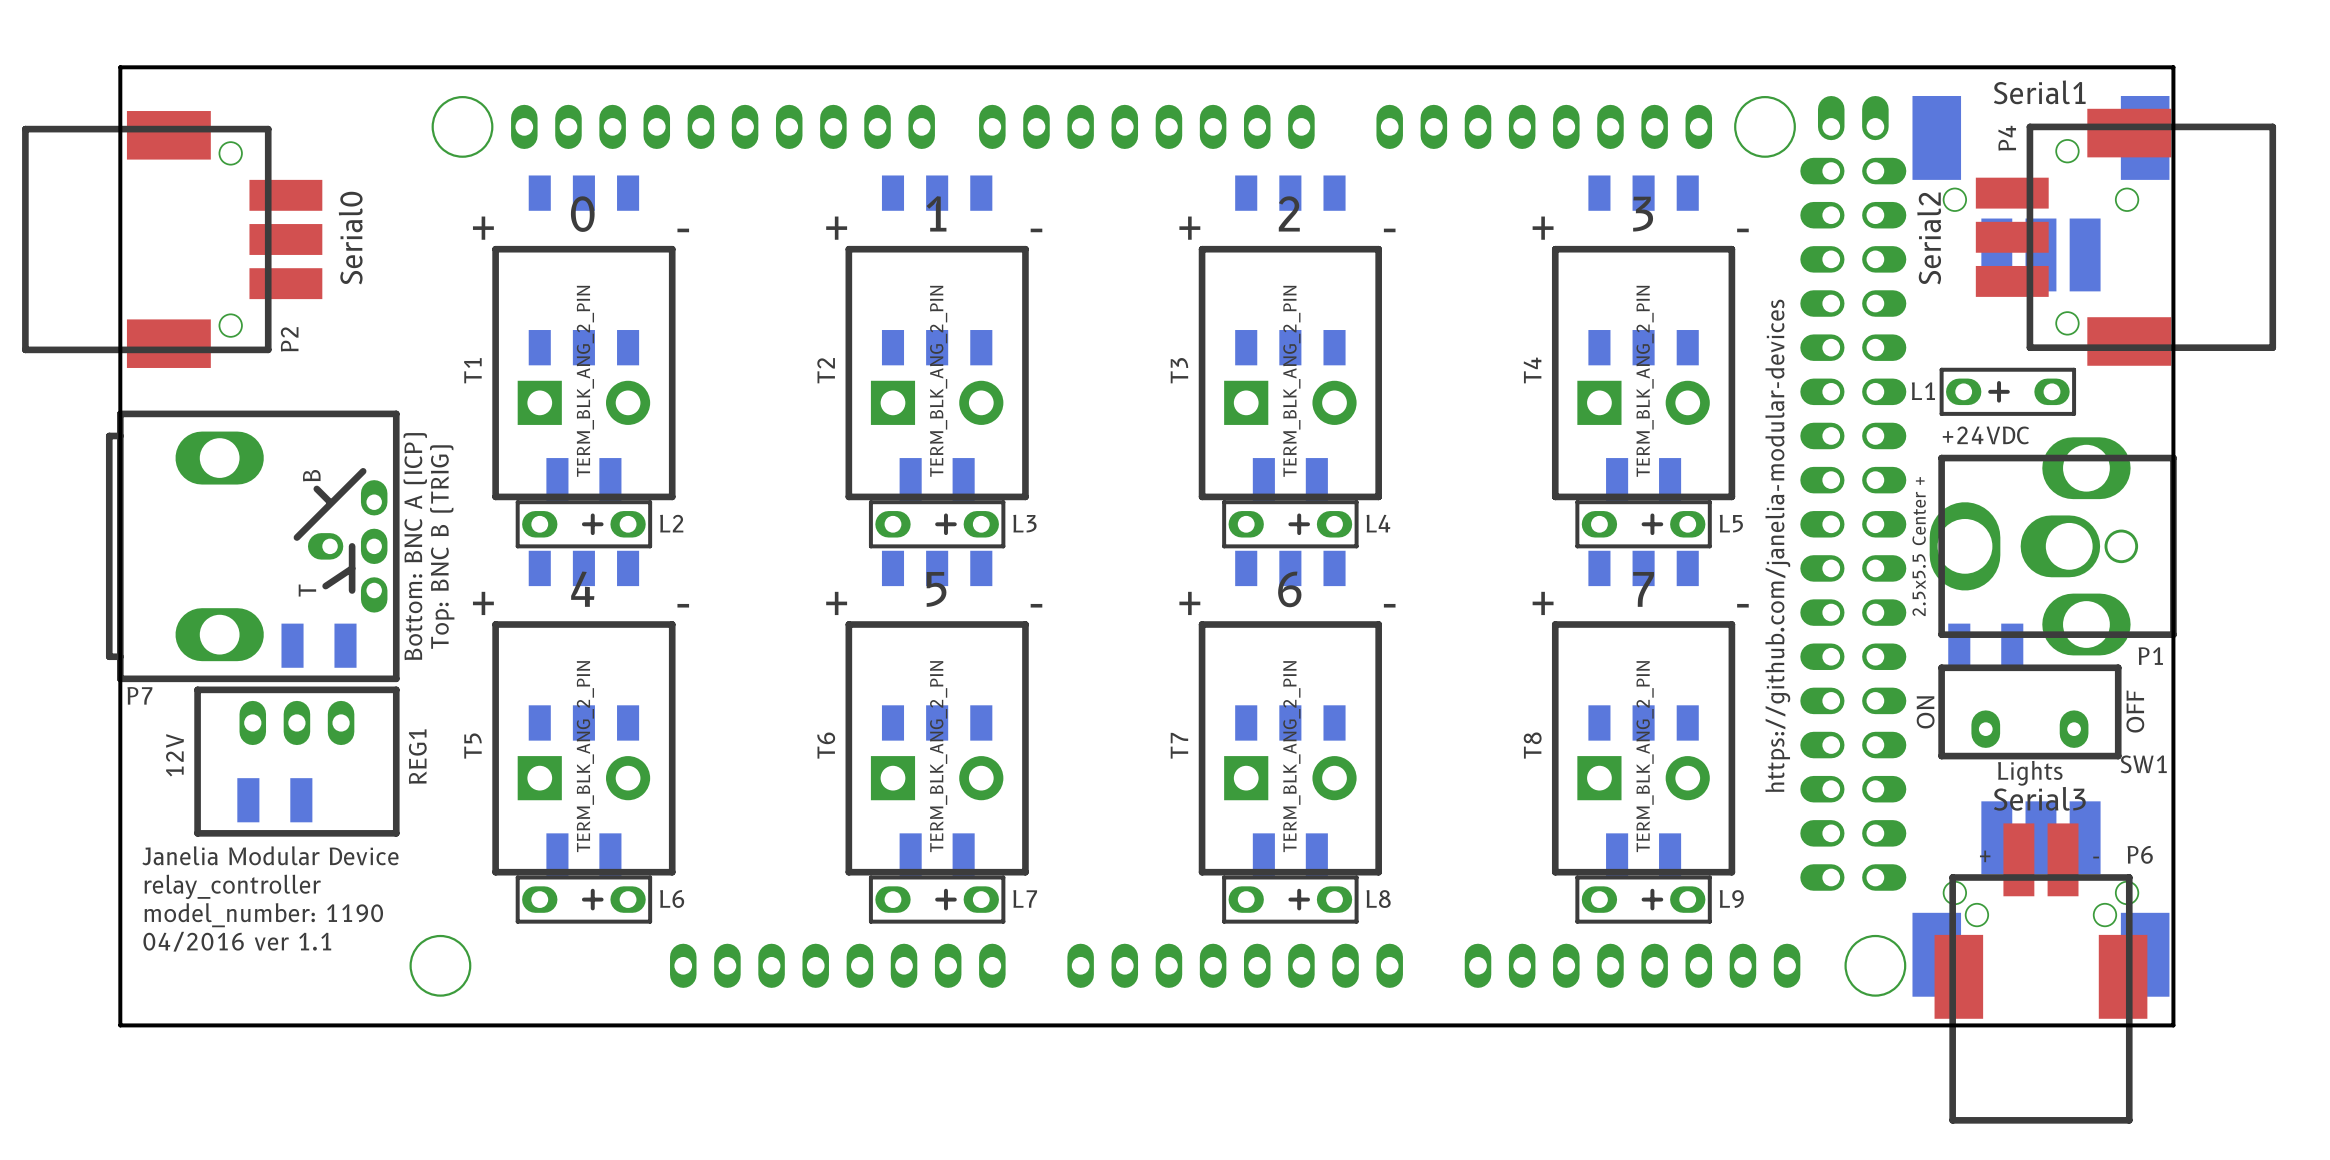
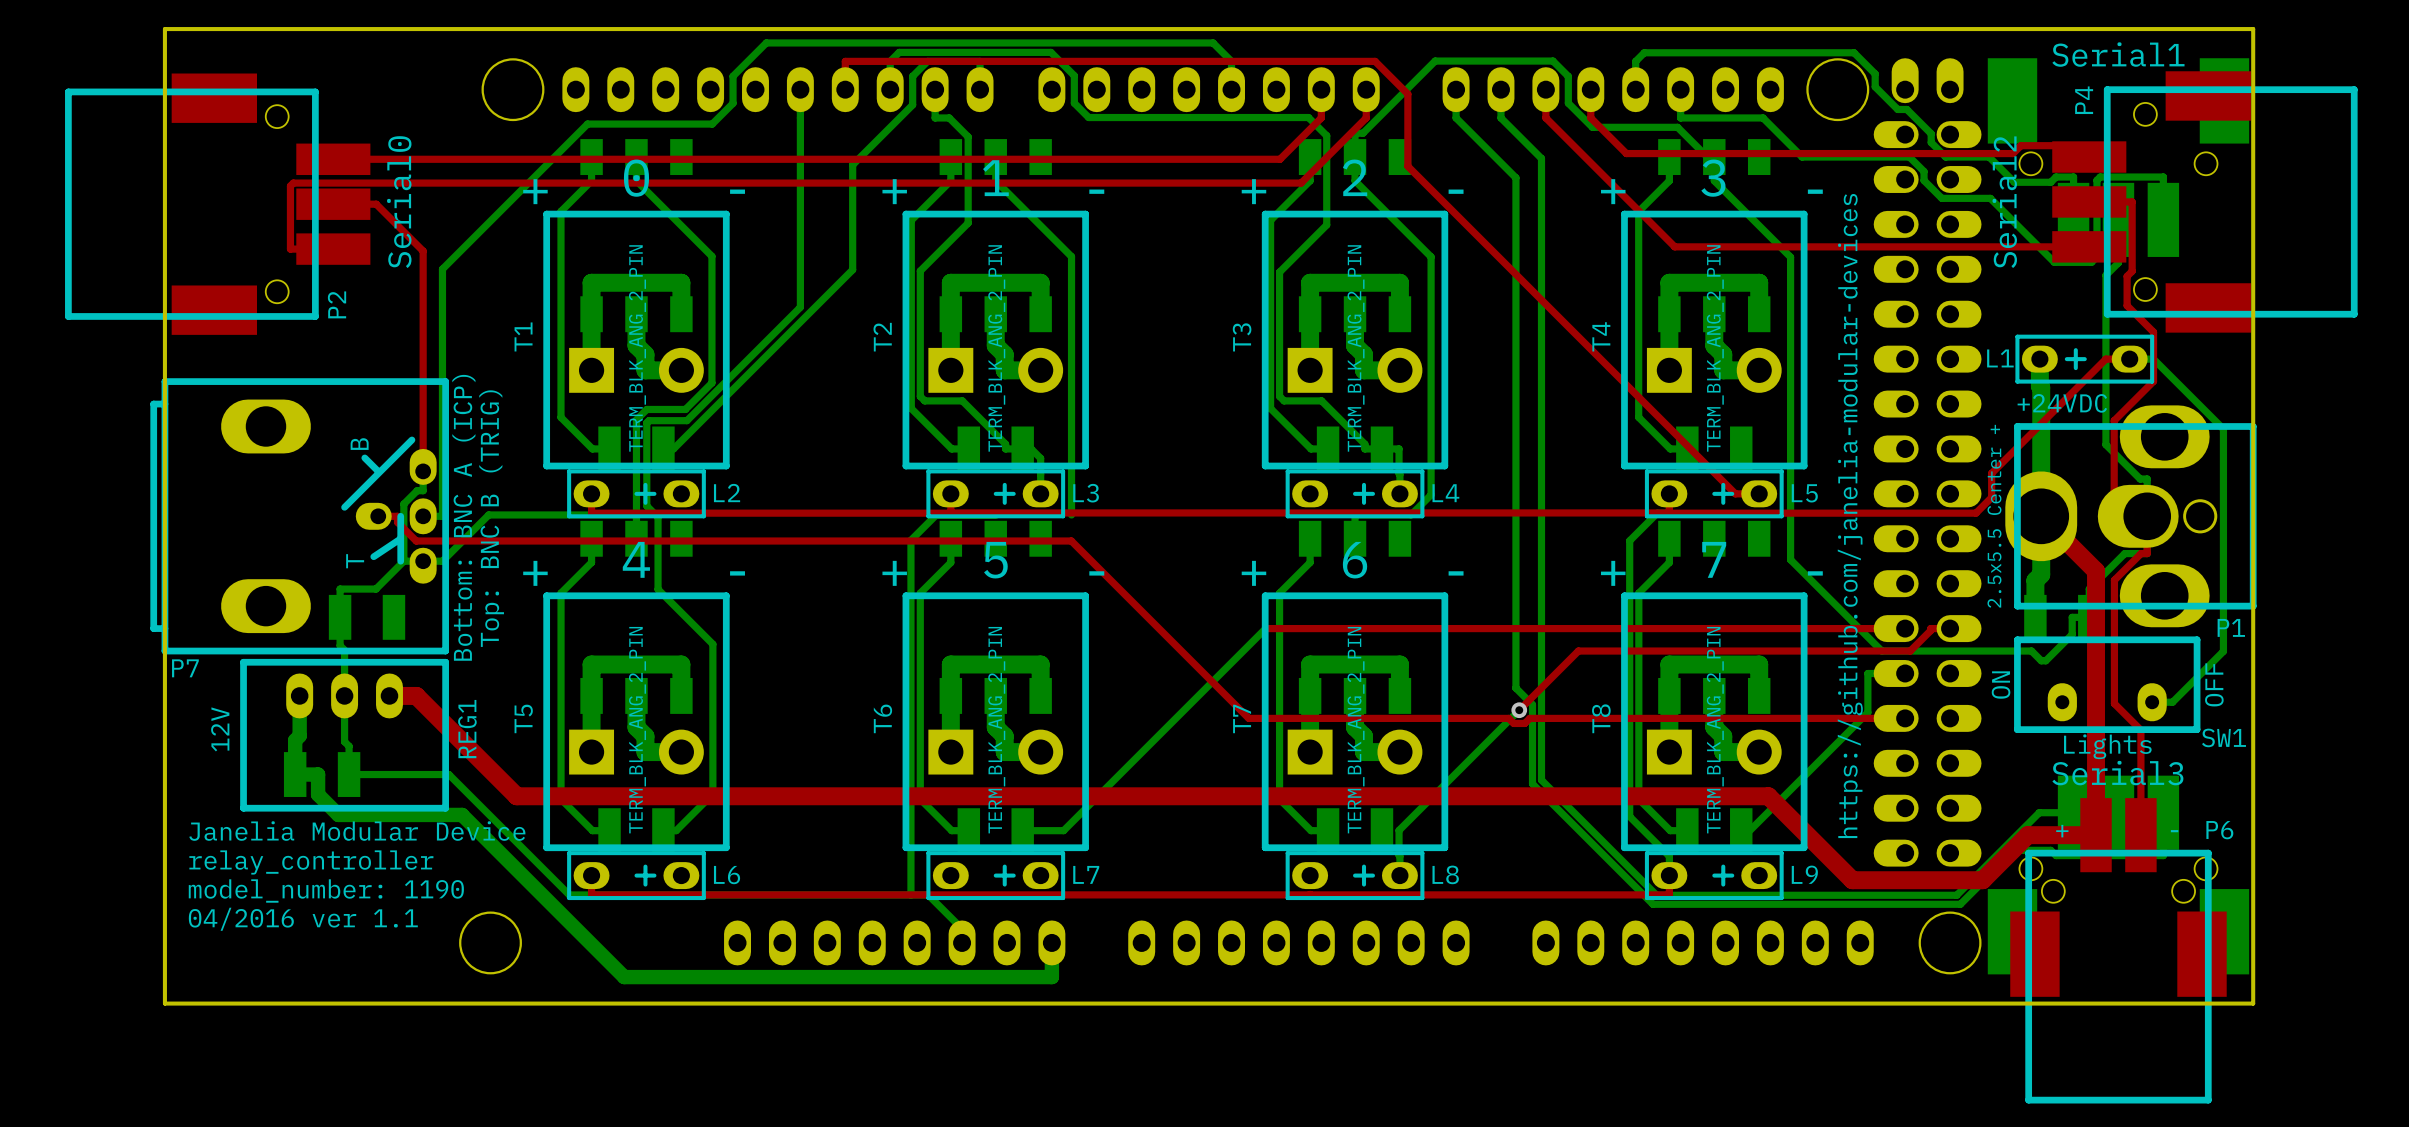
bottom track: none -> (800, 89) (800, 307) (686, 420) (648, 420) (646, 422) (646, 505) (658, 517) (658, 589) (712, 644) (712, 794) (676, 830) (663, 830)
top track: none -> (845, 89) (845, 61) (1375, 61) (1407, 94) (1407, 166) (1735, 493) (1759, 493)
bottom track: none -> (890, 89) (890, 61) (899, 52) (1050, 52) (1074, 75) (1074, 103) (1088, 117) (1308, 117) (1326, 135) (1326, 225) (1279, 272) (1279, 396) (1284, 400) (1321, 400) (1364, 444) (1364, 448) (1399, 448) (1399, 493)
bottom track: none -> (935, 89) (935, 117) (949, 117) (968, 136) (968, 223) (920, 270) (920, 396) (924, 400) (962, 400) (1005, 444) (1005, 448) (1031, 448) (1040, 458) (1040, 493)
bottom track: none -> (980, 89) (980, 61) (927, 61) (912, 76) (912, 104) (852, 164) (852, 269) (673, 448) (663, 448)
bottom track: none -> (1231, 89) (1231, 61) (1213, 42) (766, 42) (733, 76) (733, 103) (712, 124) (587, 124) (442, 269) (442, 516) (423, 516)
top track: none -> (1321, 89) (1321, 117) (1280, 159) (333, 159)
top track: none -> (1366, 89) (1366, 117) (1301, 183) (293, 183) (290, 185) (290, 249) (333, 249)
bottom track: none -> (1456, 89) (1456, 117) (1515, 177) (1515, 688) (1532, 704) (1532, 783) (1652, 904) (1960, 904) (2014, 850) (2050, 850) (2056, 855) (2163, 855) (2163, 812)
bottom track: none -> (1500, 89) (1500, 117) (1541, 158) (1541, 780) (1656, 895) (1956, 895) (2039, 812) (2073, 812)
top track: none -> (1545, 89) (1545, 117) (1674, 246) (2089, 246)
top track: none -> (1590, 89) (1590, 117) (1626, 153) (2013, 153) (2020, 145) (2077, 145) (2089, 157)
bottom track: none -> (1635, 89) (1635, 61) (1644, 52) (1854, 52) (1875, 73) (1875, 86) (1897, 109) (1906, 109) (1931, 133) (1931, 142) (1945, 157) (1989, 157) (2014, 182) (2050, 182) (2056, 177) (2073, 177) (2073, 219)
bottom track: none -> (1680, 89) (1680, 117) (1763, 117) (1802, 157) (1909, 157) (1924, 171) (1924, 180) (1941, 198) (1990, 198) (2054, 262) (2091, 262) (2096, 256) (2096, 180) (2100, 177) (2163, 177) (2163, 219)
bottom track: none -> (591, 157) (591, 180) (560, 211) (560, 417) (592, 448) (609, 448)
bottom track: none -> (636, 157) (636, 180) (711, 256) (711, 382) (685, 409) (646, 409) (636, 419) (636, 538)
bottom track: none -> (950, 157) (950, 180) (911, 220) (911, 408) (951, 448) (968, 448)
bottom track: none -> (995, 157) (995, 180) (1071, 256) (1071, 514)
bottom track: none -> (1310, 157) (1310, 180) (1270, 220) (1270, 408) (1311, 448) (1328, 448)
bottom track: none -> (1669, 157) (1669, 180) (1638, 211) (1638, 417) (1670, 448) (1687, 448)
bottom track: none -> (1714, 157) (1714, 180) (1790, 257) (1790, 559) (1881, 651) (2031, 651) (2041, 660) (2045, 660) (2072, 634) (2072, 617) (2089, 617) (2089, 589) (2124, 553) (2147, 553) (2147, 479) (2140, 479) (2105, 444) (2105, 275) (2118, 262) (2118, 219)
bottom track: none -> (1714, 164) (1677, 127) (1592, 127) (1568, 103) (1568, 76) (1552, 61) (1435, 61) (1362, 133) (1355, 133) (1355, 180) (1431, 256) (1431, 494) (1411, 514) (1355, 514) (1355, 538)
top track: none -> (2089, 201) (2132, 201) (2132, 271) (2127, 276) (2127, 305) (2153, 332) (2153, 381) (2114, 420) (2114, 491) (2147, 524)
top track: none -> (333, 204) (376, 204) (423, 251) (423, 471)
bottom track: none -> (636, 314) (636, 345) (645, 354) (645, 370) (681, 370)
bottom track: none -> (681, 314) (681, 282) (591, 282) (591, 370)
bottom track: none -> (995, 314) (995, 345) (1004, 354) (1004, 370) (1040, 370)
bottom track: none -> (1040, 314) (1040, 282) (950, 282) (950, 370)
bottom track: none -> (1355, 314) (1355, 345) (1364, 354) (1364, 370) (1399, 370)
bottom track: none -> (1399, 314) (1399, 282) (1310, 282) (1310, 370)
bottom track: none -> (1714, 314) (1714, 345) (1723, 354) (1723, 370) (1759, 370)
bottom track: none -> (1759, 314) (1759, 282) (1669, 282) (1669, 370)
bottom track: none -> (2039, 359) (2041, 574) (2035, 580) (2035, 617)
bottom track: none -> (2129, 359) (2153, 359) (2223, 429) (2223, 651) (2172, 702) (2152, 702)
top track: none -> (2129, 359) (2105, 359) (1991, 473) (1991, 497) (1976, 513) (1669, 513) (1669, 493)
bottom track: none -> (423, 471) (423, 490) (417, 490) (403, 504) (403, 561)
top track: none -> (591, 493) (591, 513) (950, 513) (950, 493)
bottom track: none -> (1669, 493) (1669, 513) (1657, 513) (1629, 540) (1629, 816) (1669, 856) (1669, 875)
top track: none -> (951, 512) (1669, 512)
bottom track: none -> (636, 514) (488, 514) (442, 561) (403, 561)
bottom track: none -> (995, 515) (935, 515) (910, 540) (910, 894)
top track: none -> (378, 516) (397, 516) (397, 522) (416, 541) (1071, 541) (1248, 718) (1508, 718) (1513, 723) (1524, 723) (1529, 718) (1905, 718)
top track: none -> (2041, 516) (2096, 571) (2096, 835) (2027, 835) (1982, 880) (1852, 880) (1768, 796) (516, 796) (416, 695) (389, 695)
top track: none -> (2147, 516) (2147, 553) (2141, 553) (2114, 580) (2114, 703) (2140, 730) (2140, 835)
bottom track: none -> (591, 538) (591, 562) (561, 593) (561, 799) (592, 830) (609, 830)
bottom track: none -> (950, 538) (950, 562) (920, 593) (920, 799) (951, 830) (968, 830)
bottom track: none -> (1310, 538) (1310, 562) (1279, 593) (1279, 799) (1311, 830) (1328, 830)
bottom track: none -> (1669, 538) (1669, 562) (1638, 593) (1638, 799) (1670, 830) (1687, 830)
bottom track: none -> (403, 561) (376, 589) (340, 589) (340, 645) (344, 650) (344, 741) (349, 746) (349, 774) (448, 774) (569, 894) (928, 894) (962, 928) (962, 942)
bottom track: none -> (1265, 628) (1063, 830) (1022, 830)
top track: none -> (1265, 628) (1905, 628)
top track: none -> (1950, 628) (1930, 628) (1910, 651) (1578, 651) (1519, 710)
bottom track: none -> (1905, 673) (1867, 673) (1867, 712) (1749, 830)
bottom track: none -> (299, 695) (299, 735) (295, 740) (295, 774) (318, 774) (318, 794) (338, 814) (462, 814) (624, 977) (1051, 977) (1051, 942)
bottom track: none -> (636, 695) (636, 727) (645, 736) (645, 752) (681, 752)
bottom track: none -> (681, 695) (681, 664) (591, 664) (591, 752)
bottom track: none -> (995, 695) (995, 727) (1004, 736) (1004, 752) (1040, 752)
bottom track: none -> (1040, 695) (1040, 664) (950, 664) (950, 752)
bottom track: none -> (1355, 695) (1355, 727) (1364, 736) (1364, 752) (1399, 752)
bottom track: none -> (1399, 695) (1399, 664) (1310, 664) (1310, 752)
bottom track: none -> (1714, 695) (1714, 727) (1723, 736) (1723, 752) (1759, 752)
bottom track: none -> (1759, 695) (1759, 664) (1669, 664) (1669, 752)
bottom track: none -> (1519, 710) (1399, 830) (1399, 875)
via: none -> (1519, 710)
top track: none -> (591, 875) (591, 894) (1669, 894) (1669, 875)

